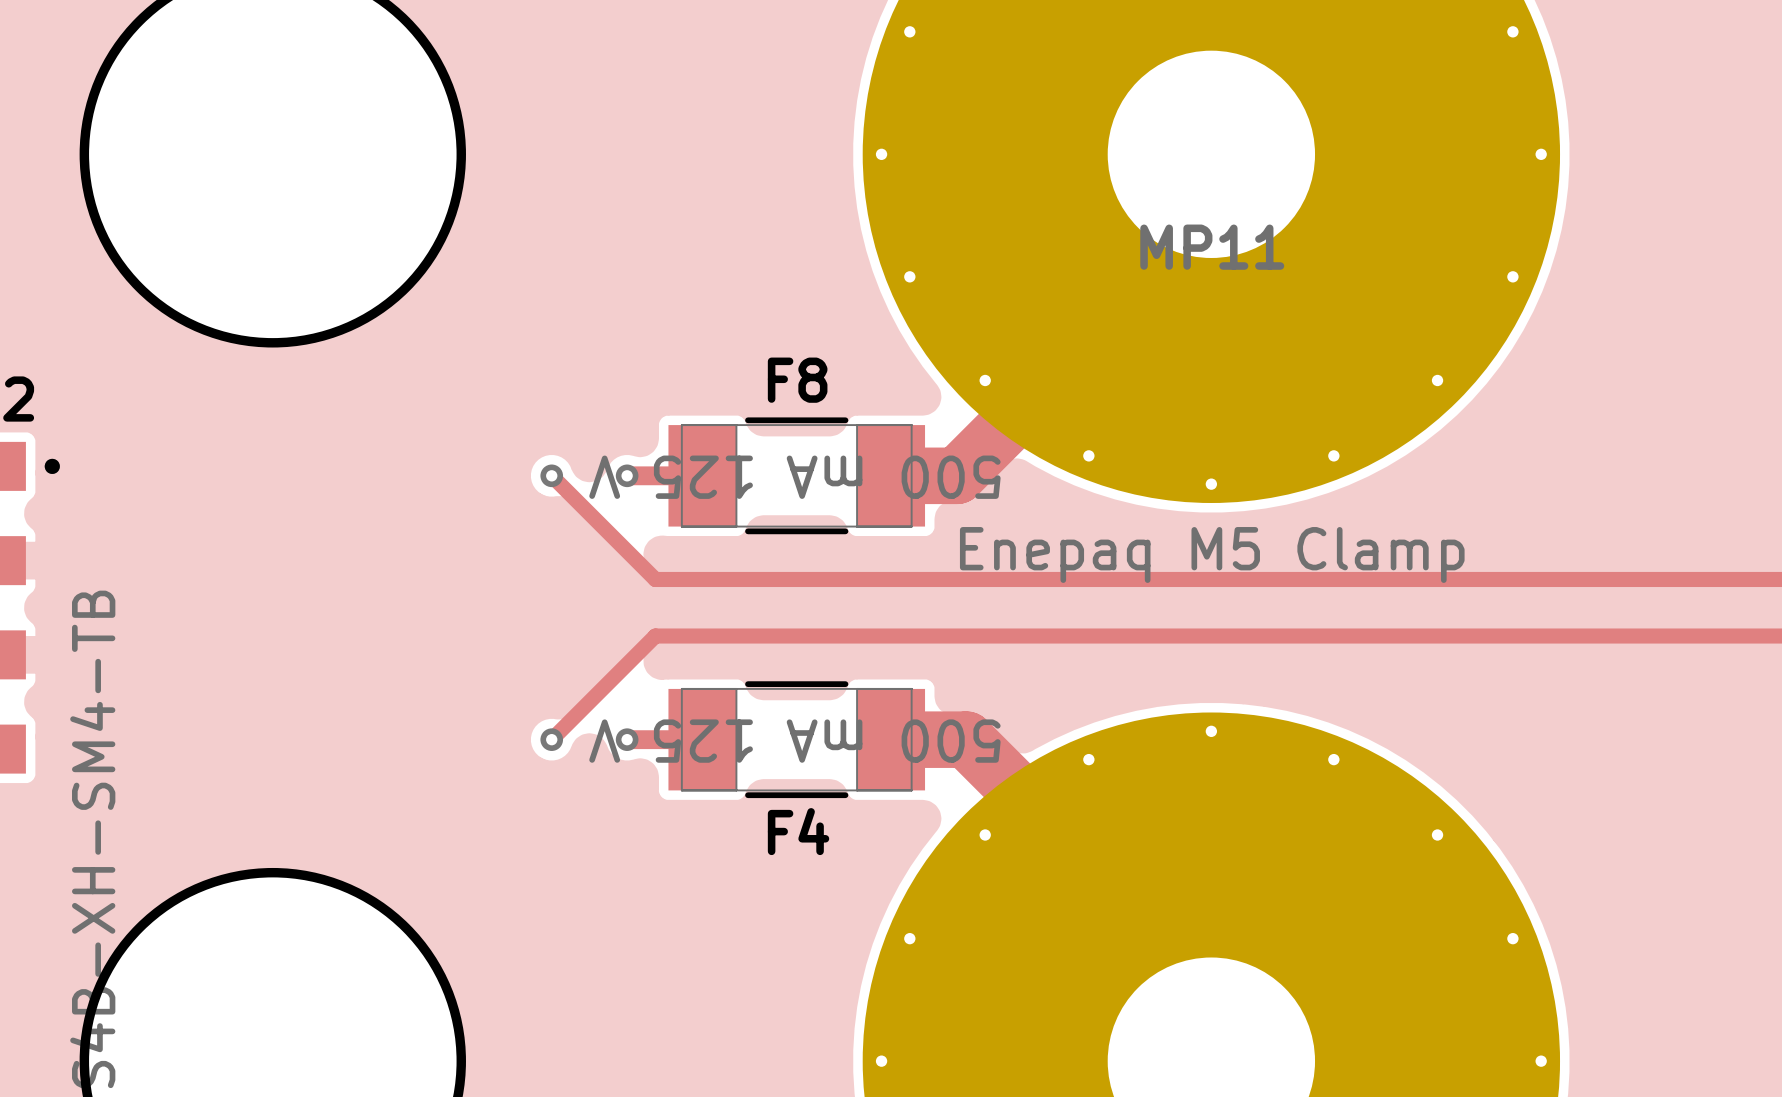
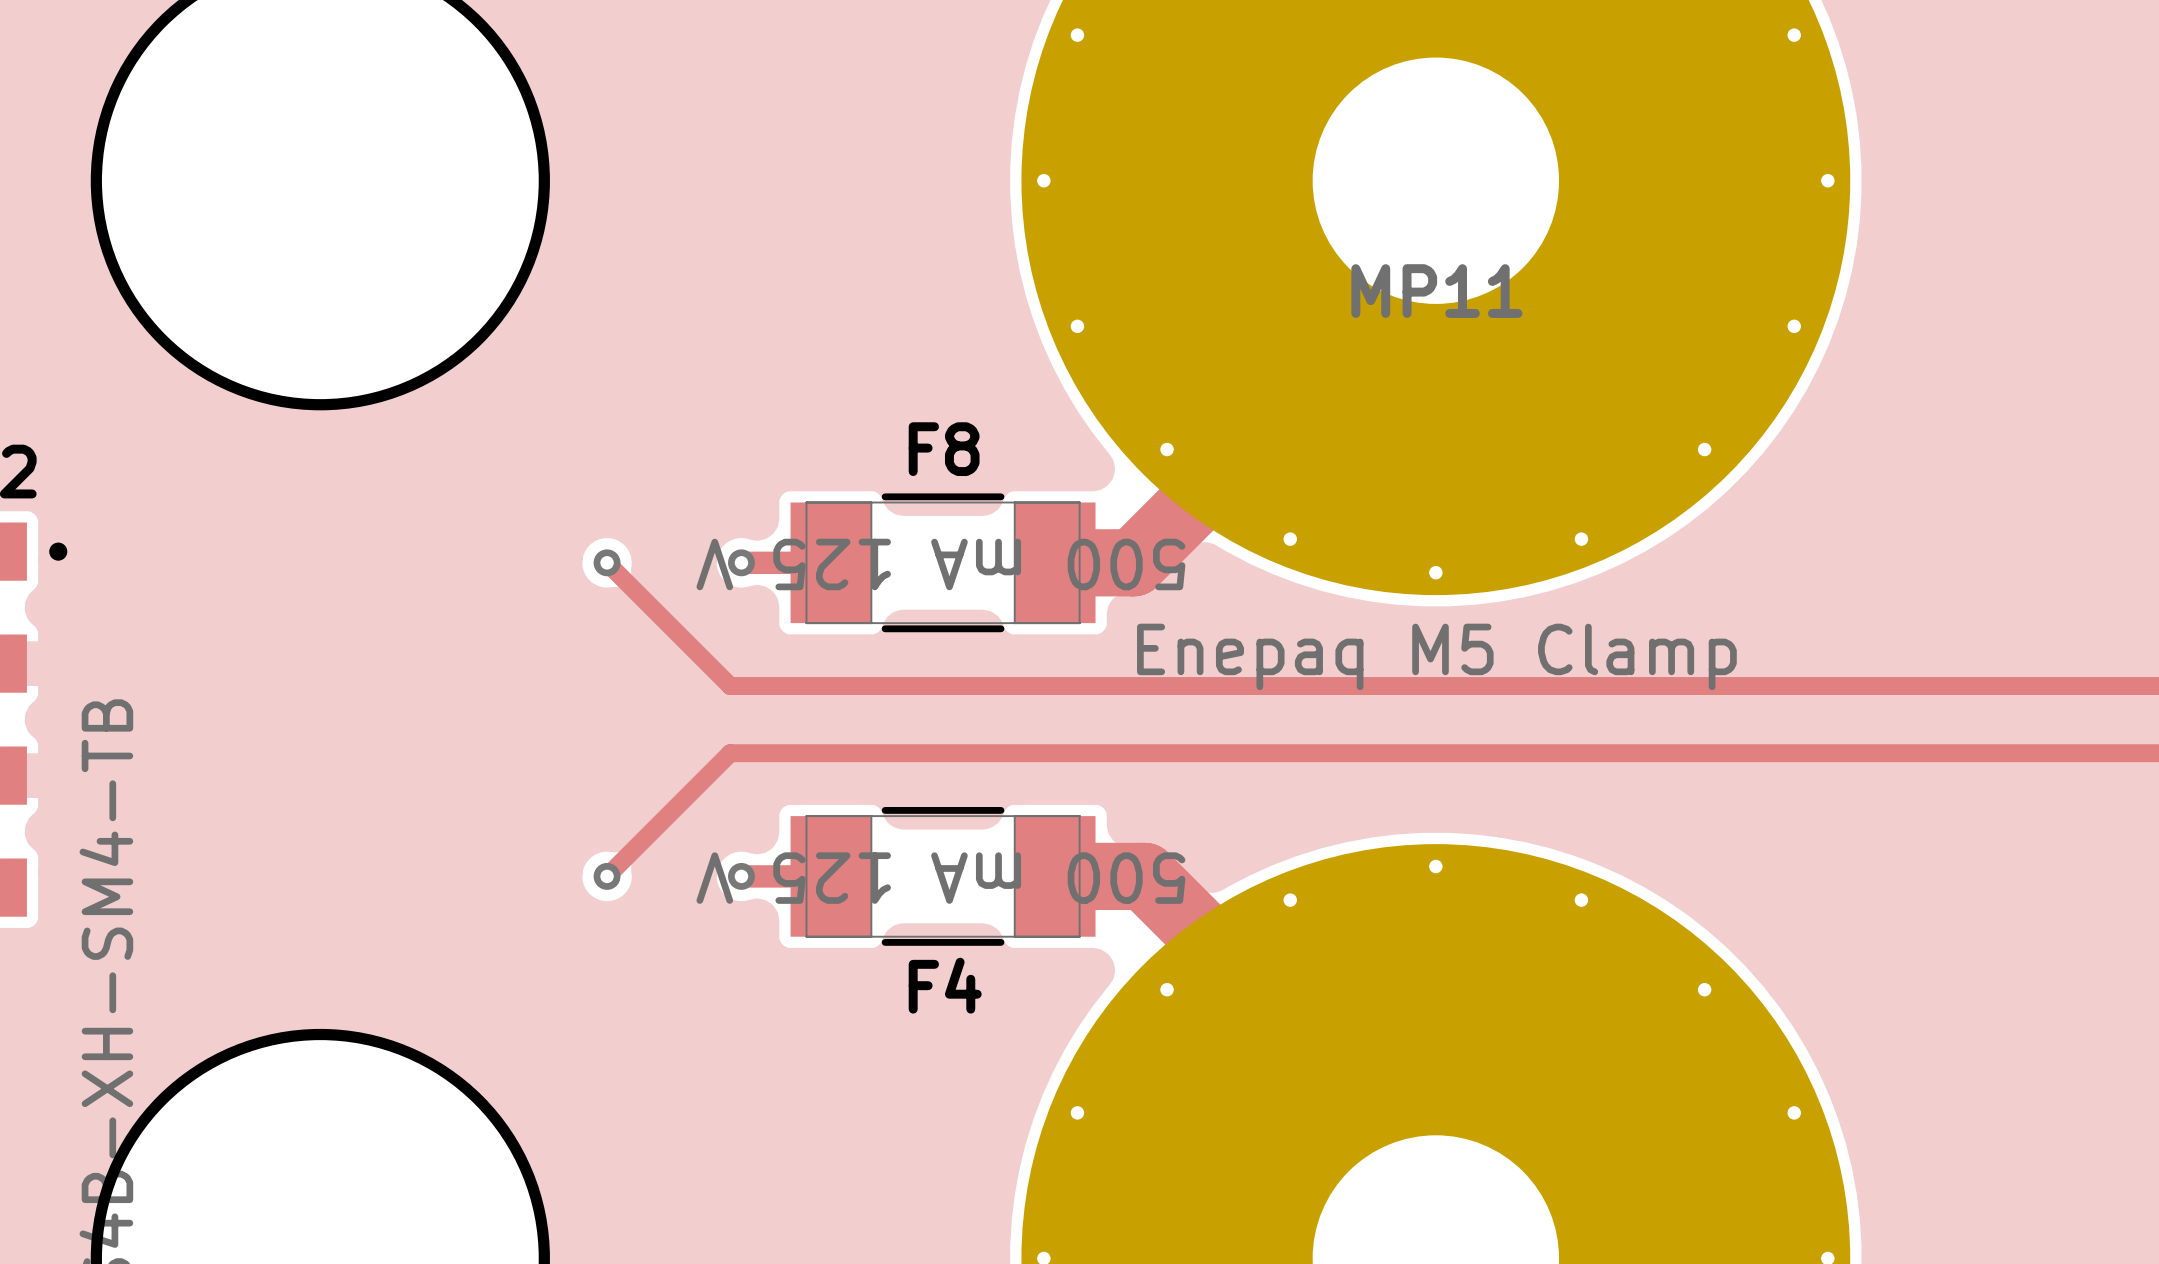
track: (551, 475) (655, 579) -> (607, 562) (730, 686) (775, 686)
via position: (551, 475) -> (607, 562)
track: (655, 636) (551, 739) -> (775, 753) (730, 753) (607, 876)
via position: (551, 739) -> (607, 876)

